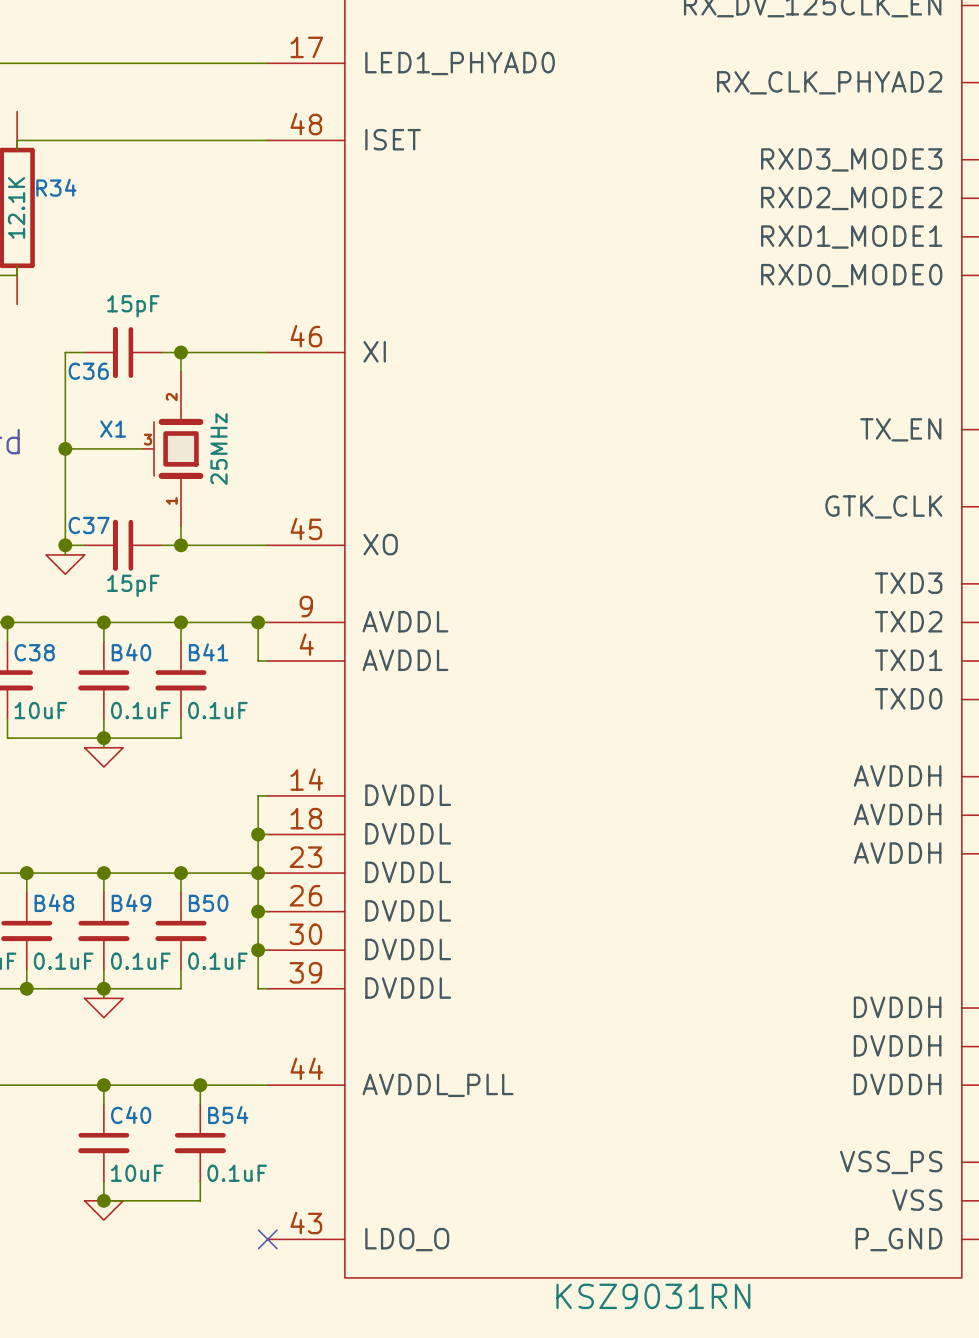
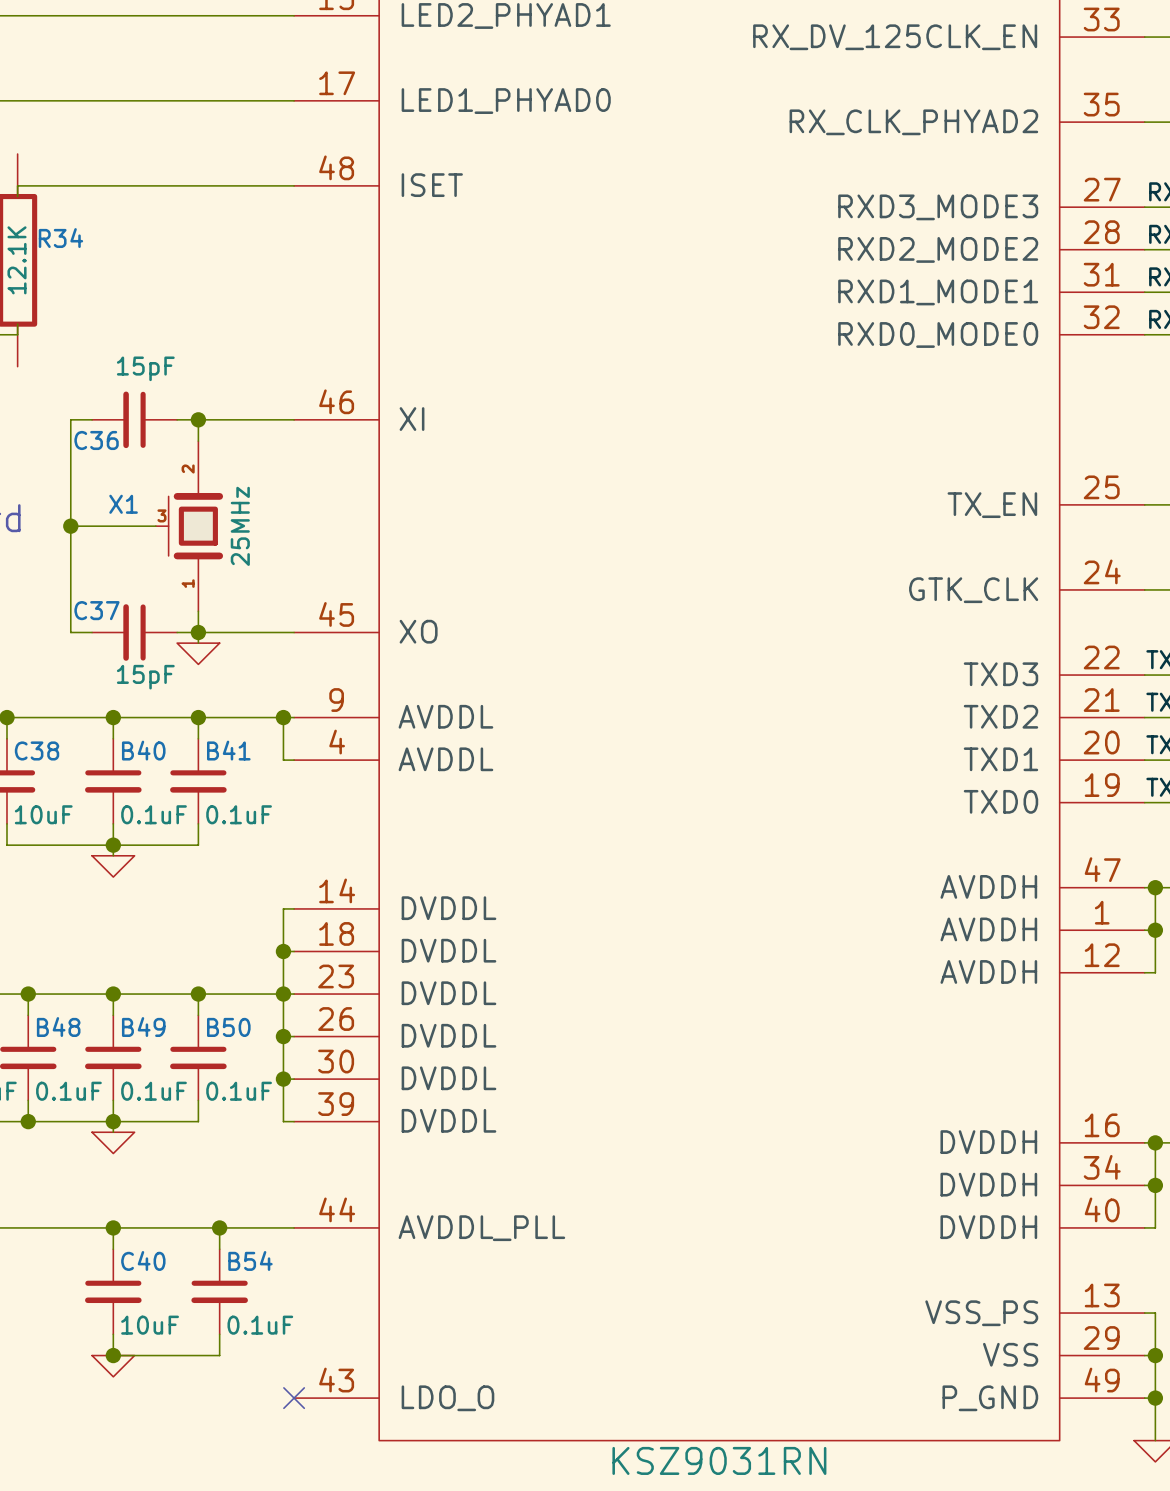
junction: (65, 545) -> none
power symbol position: (65, 564) -> (198, 653)

